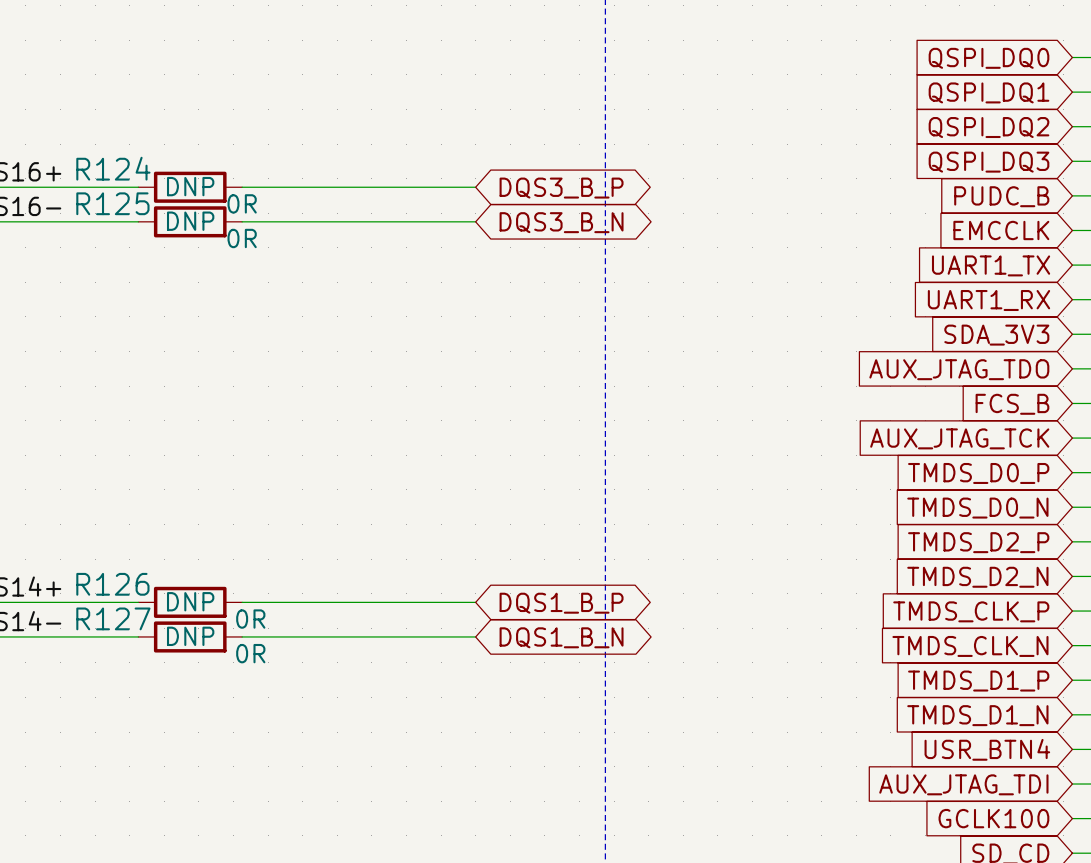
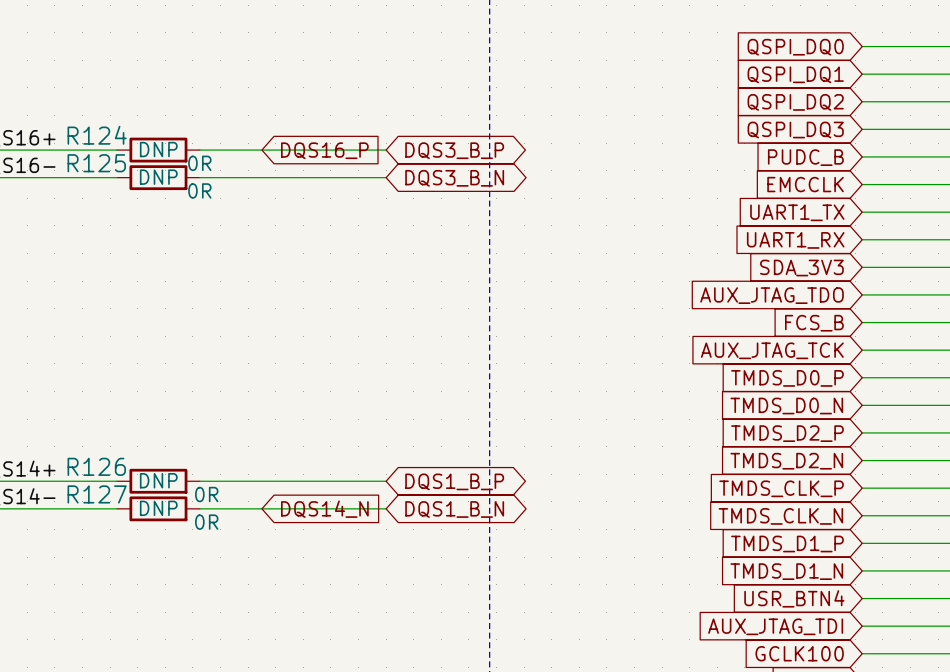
global label: none -> DQS16_P (324, 150)
global label: none -> DQS14_N (324, 509)

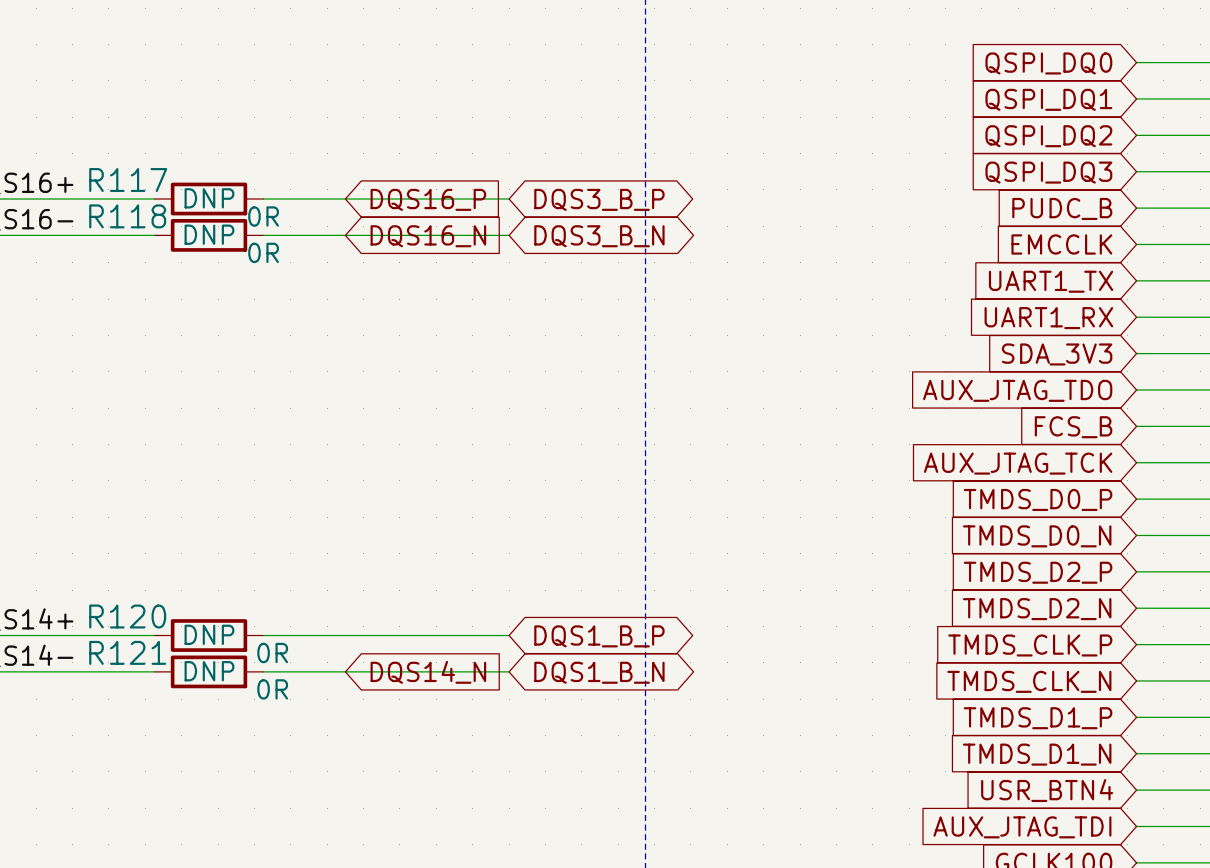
R124 name: R124 (97, 135) -> R117 (128, 180)
R125 name: R125 (96, 163) -> R118 (127, 216)
global label: none -> DQS16_N (428, 236)
R126 name: R126 (96, 466) -> R120 (127, 616)
R127 name: R127 (97, 494) -> R121 (127, 652)

